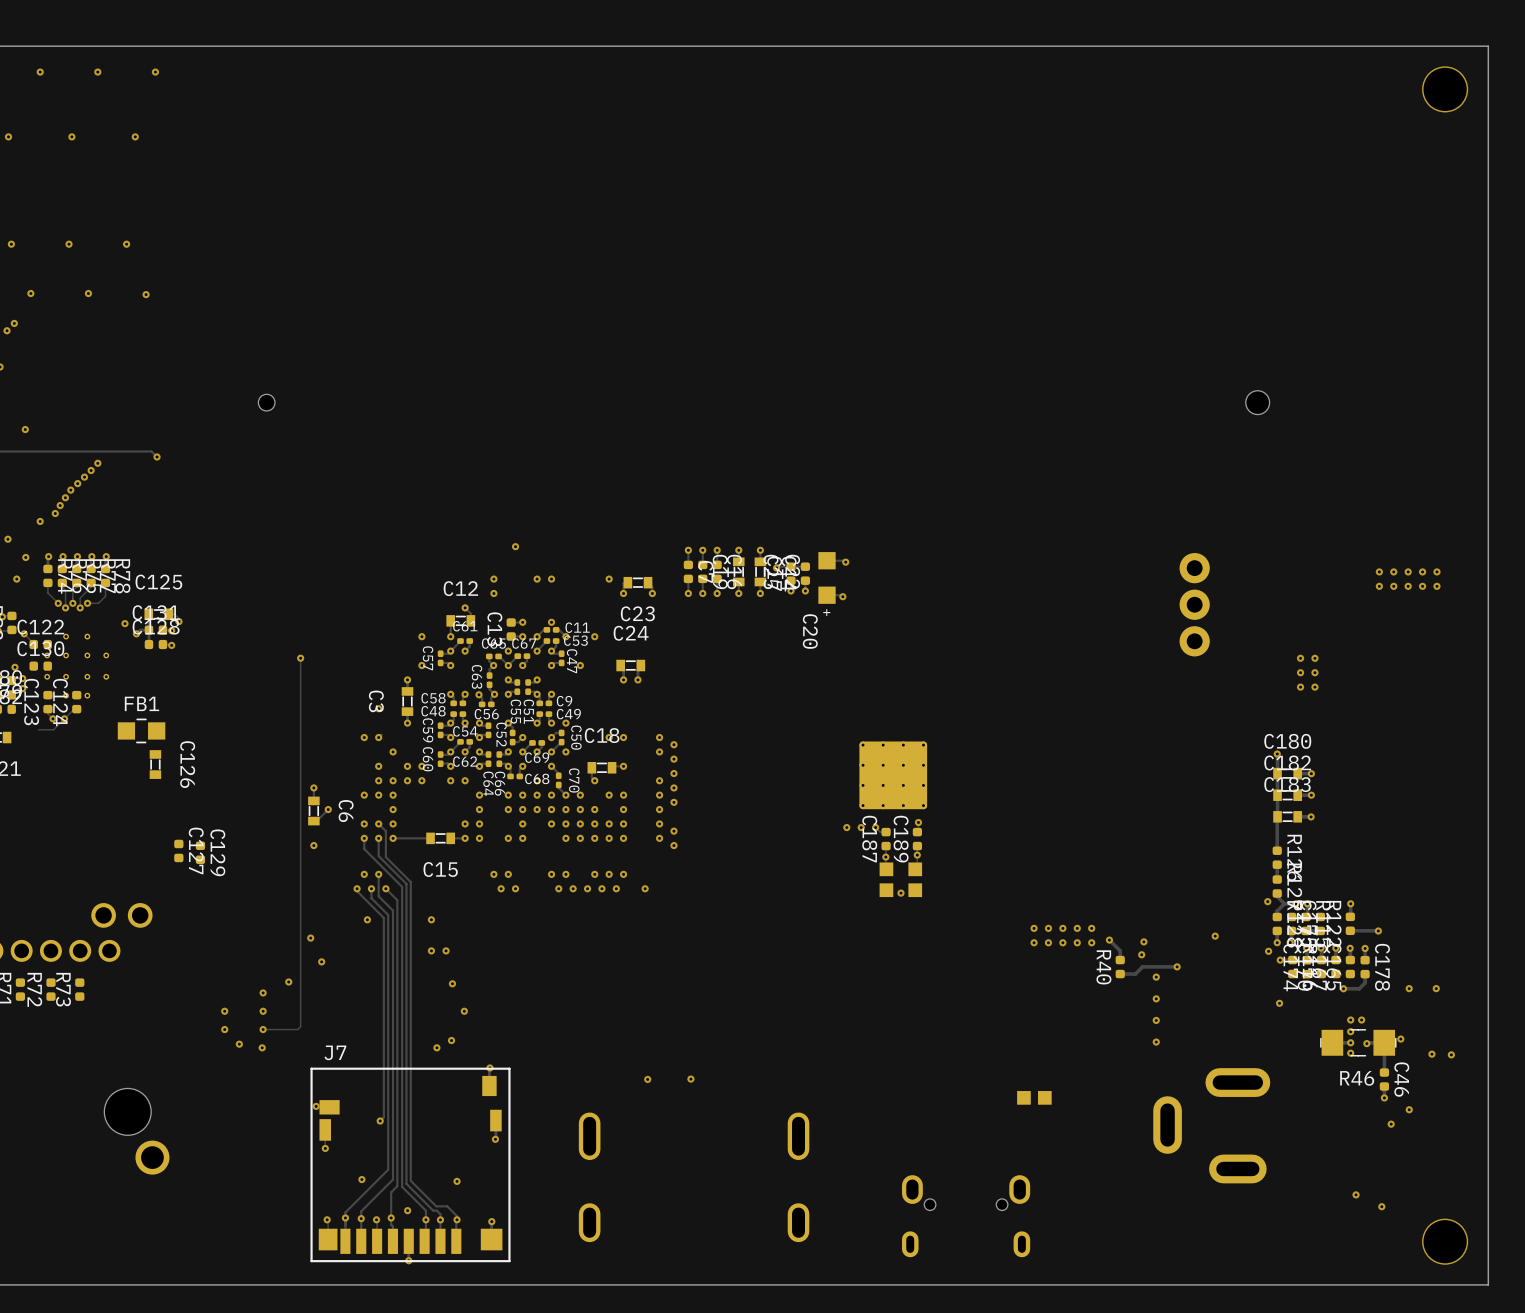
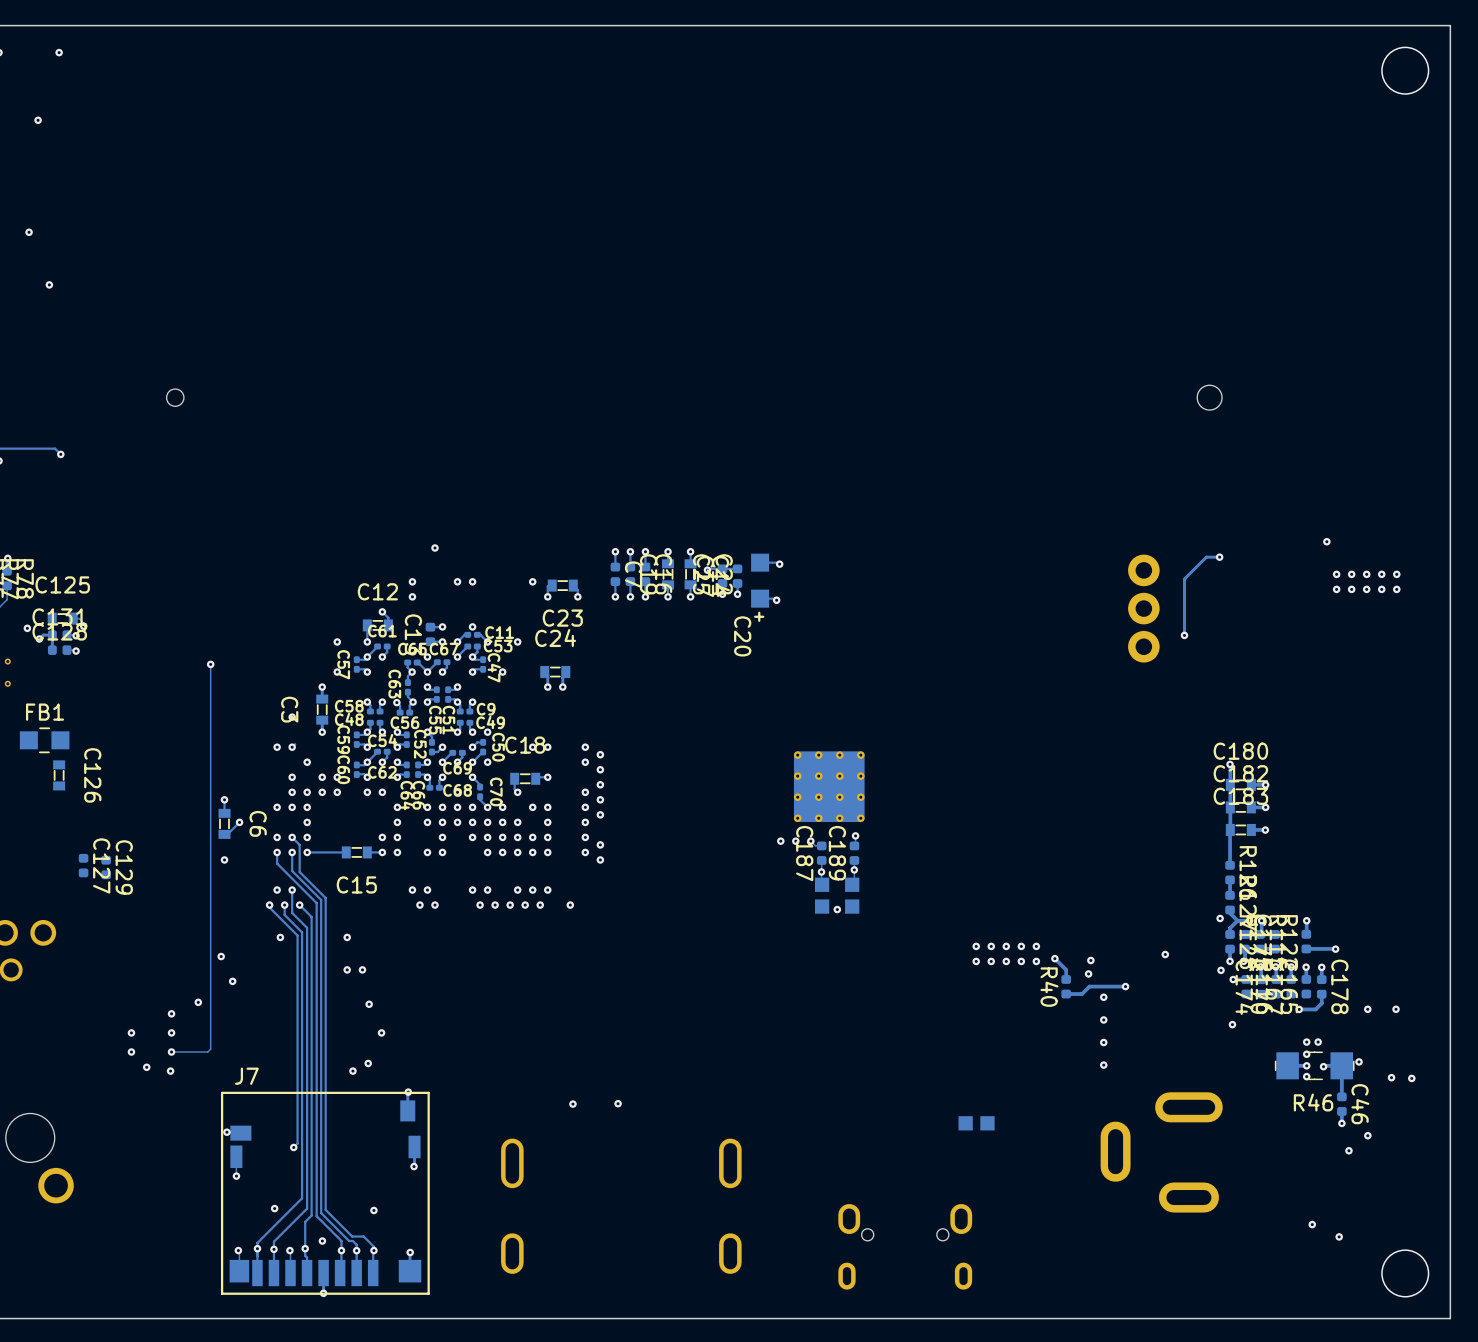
via: none -> (1326, 541)
track: none -> (1219, 557) (1206, 557) (1184, 579) (1184, 635)
via: none -> (1219, 557)
via: none -> (1184, 635)
via: (1300, 658) -> none
via: (1314, 658) -> none
via: (1300, 672) -> none
via: (1314, 672) -> none
via: (1300, 687) -> none
via: (1314, 687) -> none

